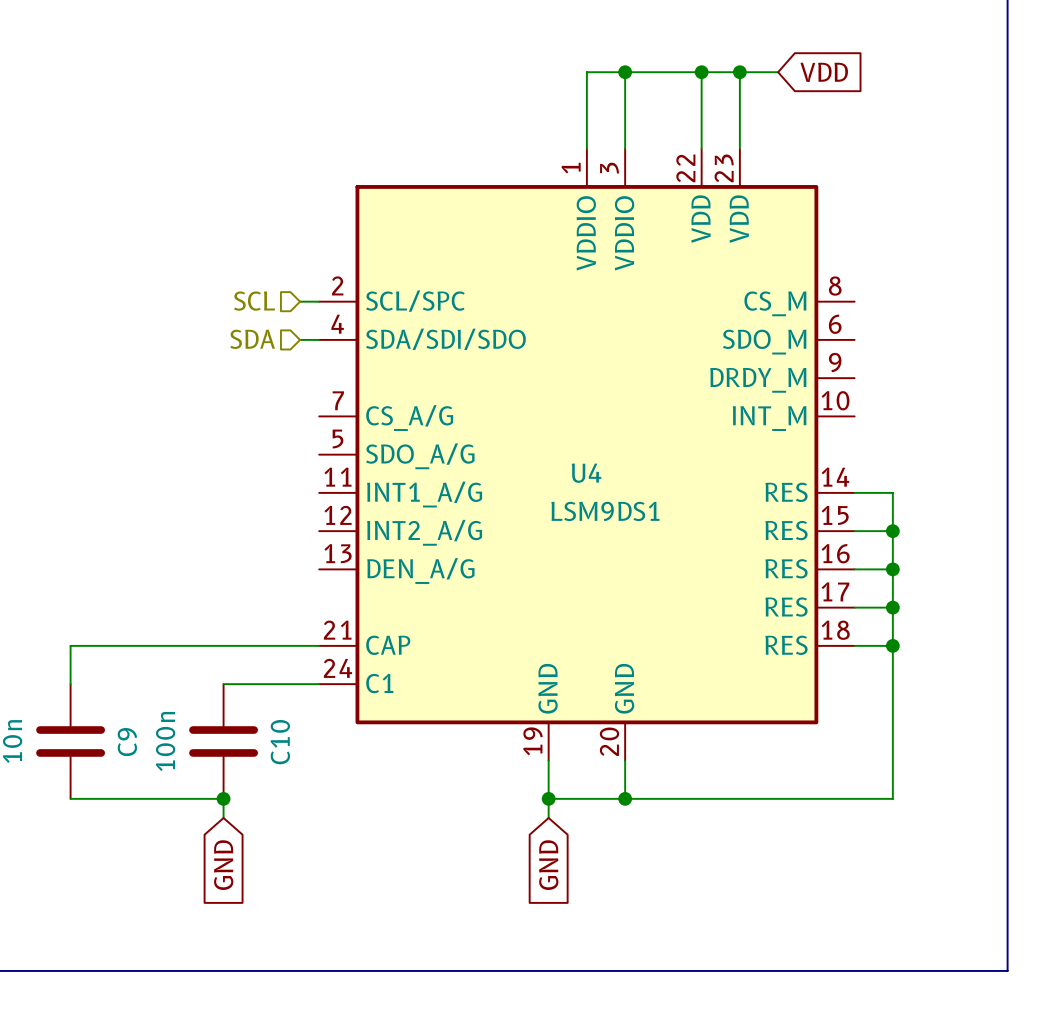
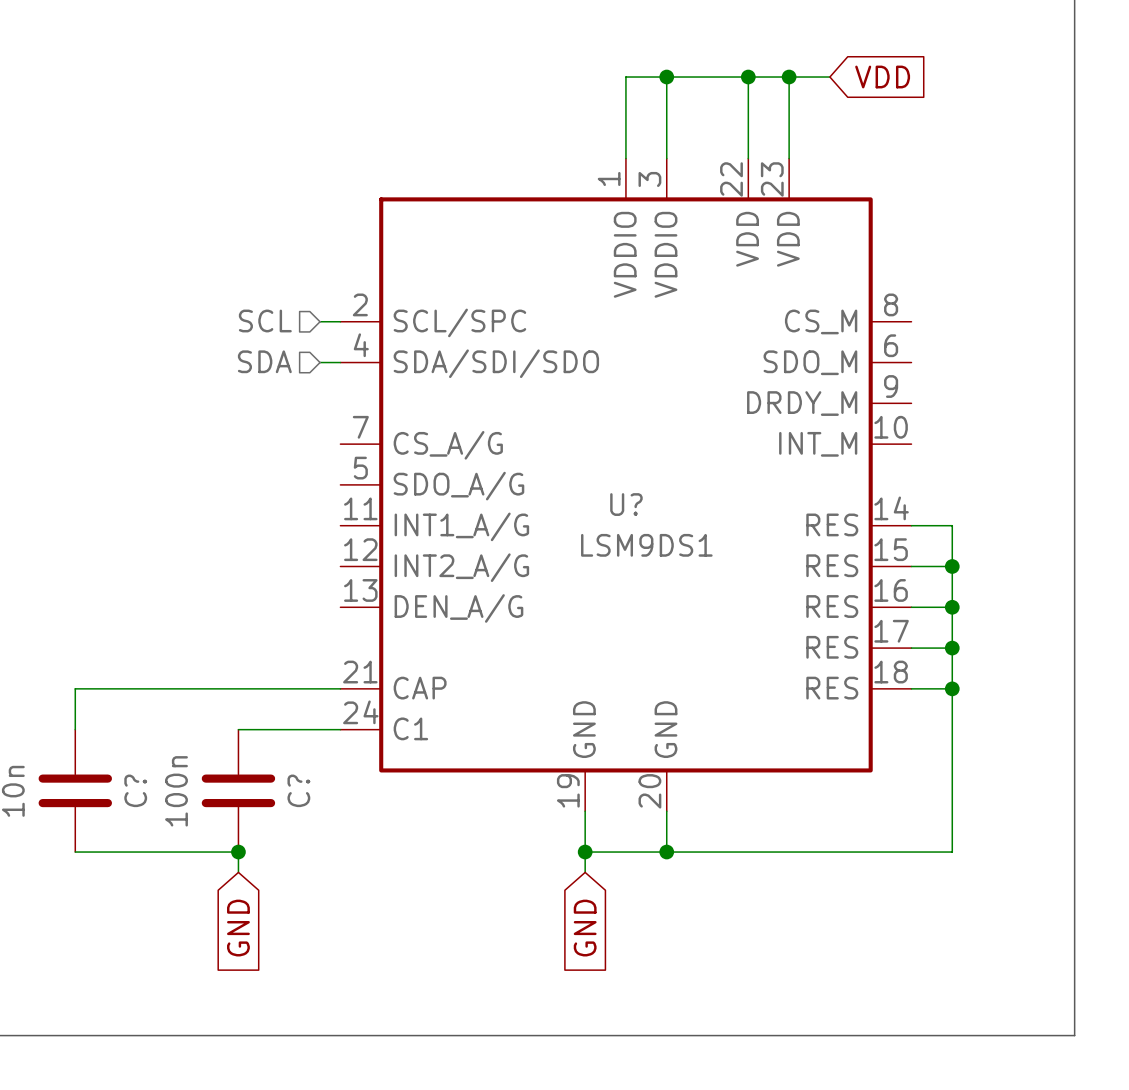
U4 name: U4 (586, 473) -> U? (626, 504)
C9 name: C9 (127, 742) -> C? (135, 790)
C10 name: C10 (280, 742) -> C? (298, 790)

